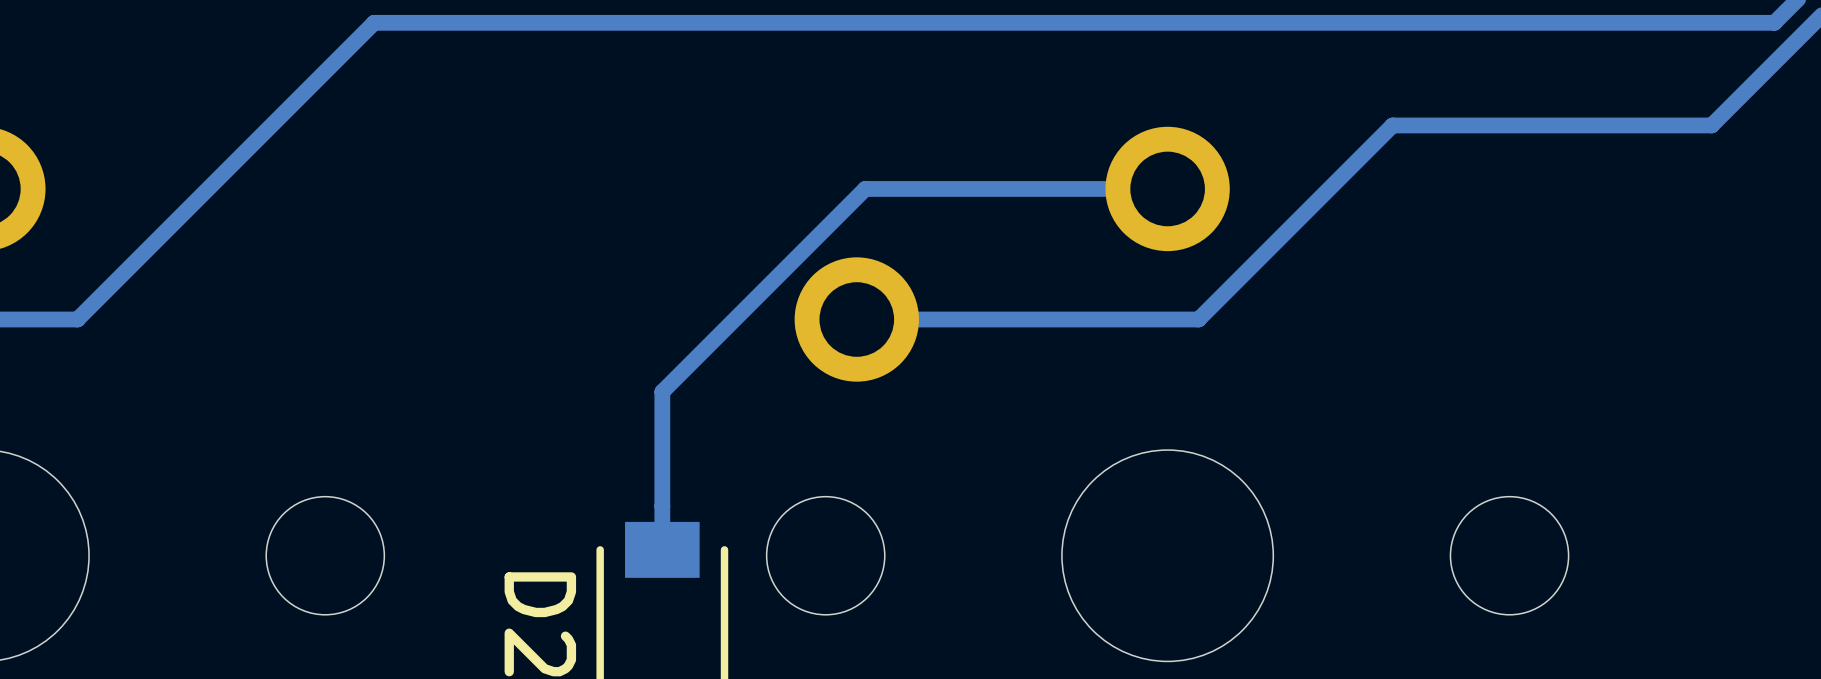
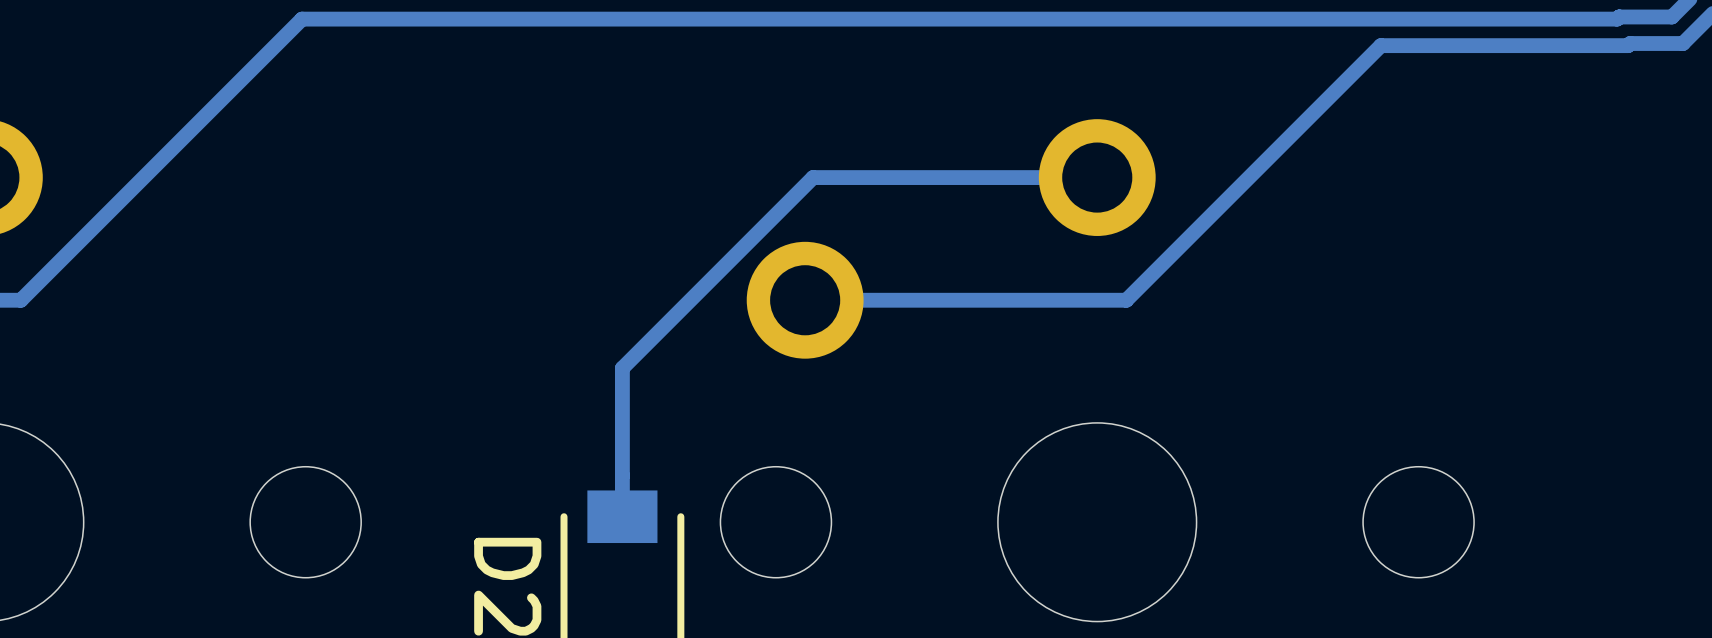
track: (1779, 18) (1774, 22) (374, 22) (77, 319) (22, 319) -> (1671, 16) (1619, 16) (1617, 19) (302, 19) (20, 300)
track: (1790, 46) (1711, 125) (1392, 125) -> (1682, 43) (1630, 43) (1628, 45) (1380, 45) (1308, 117)

